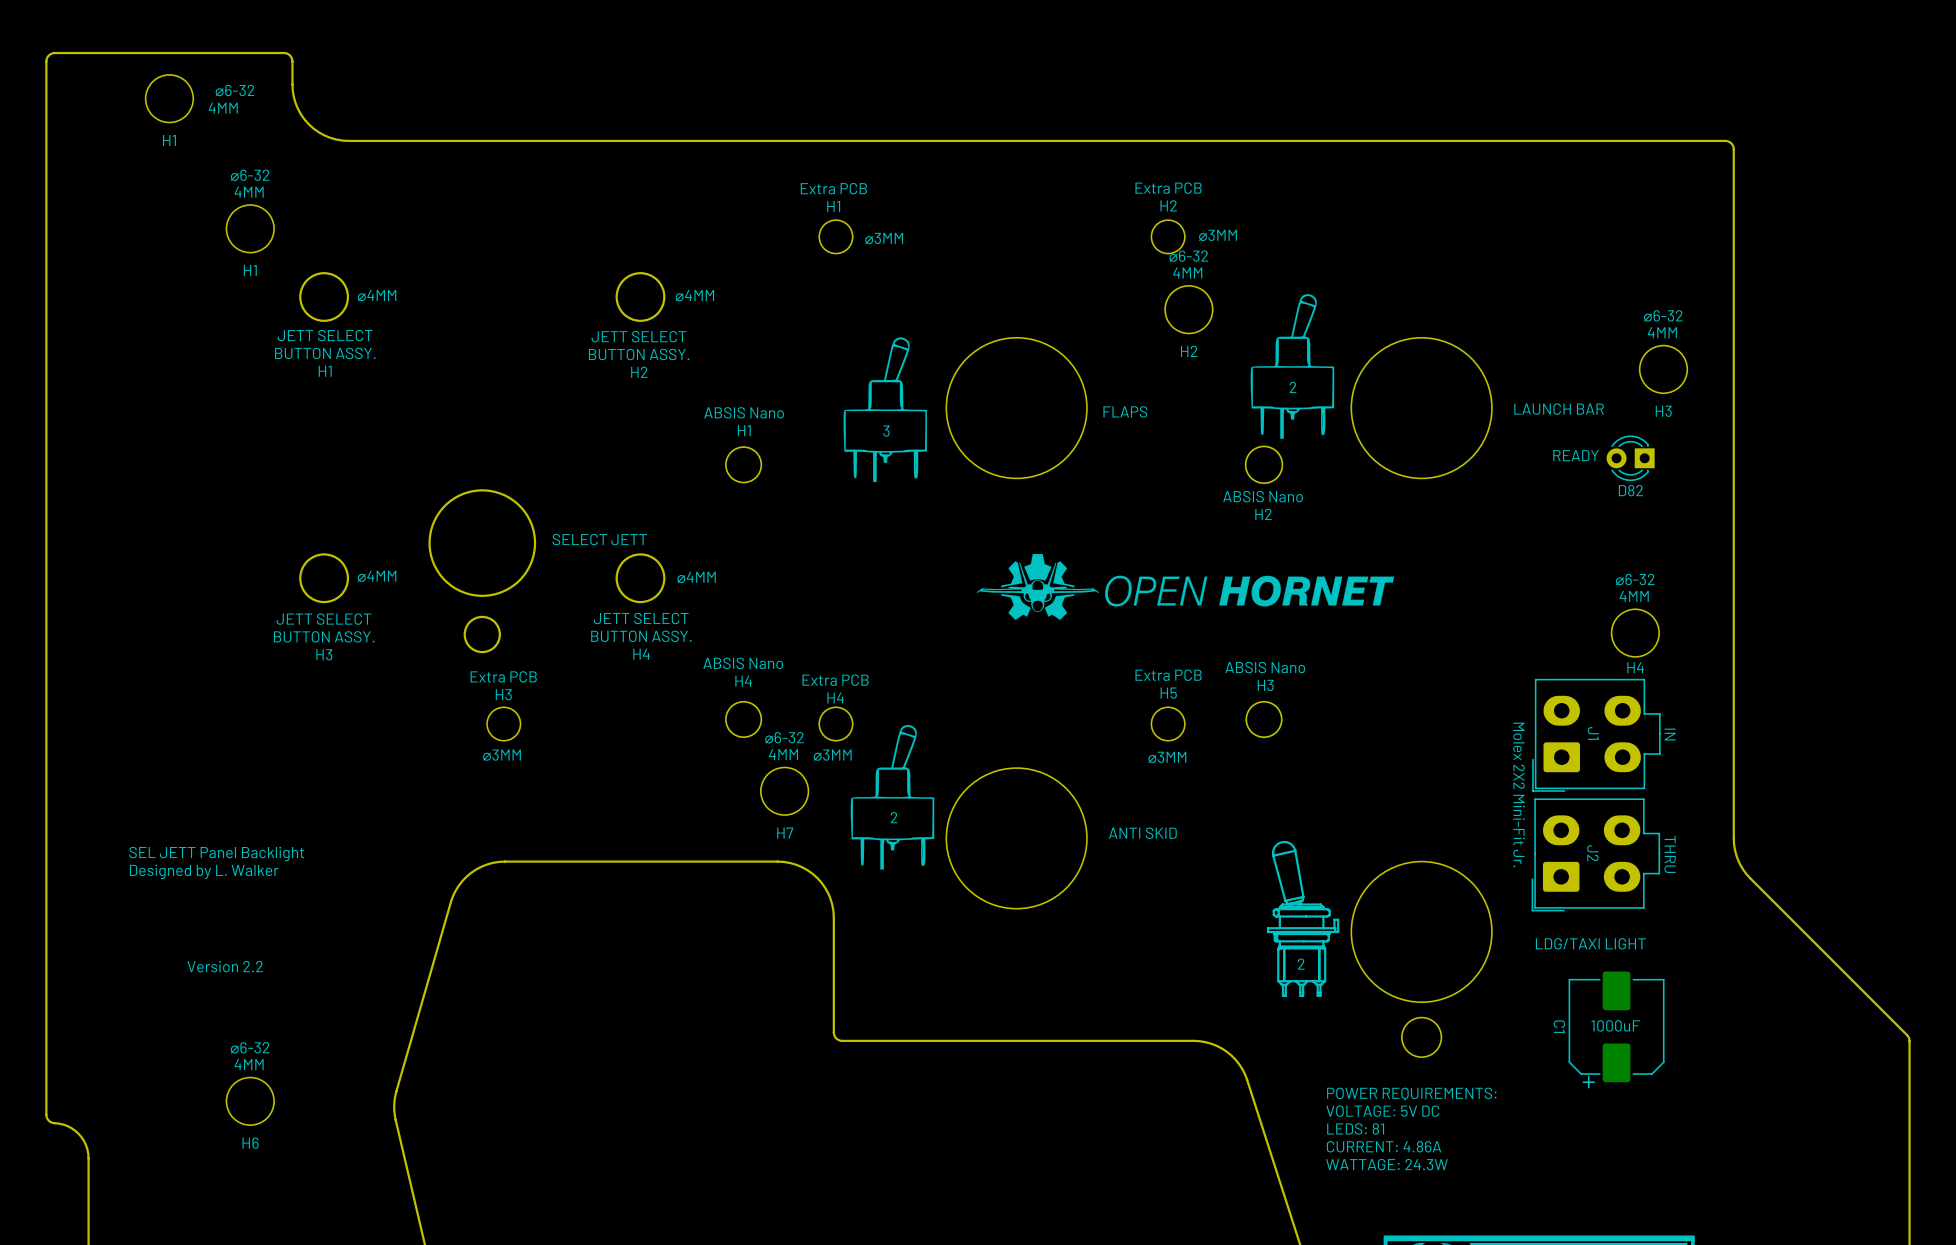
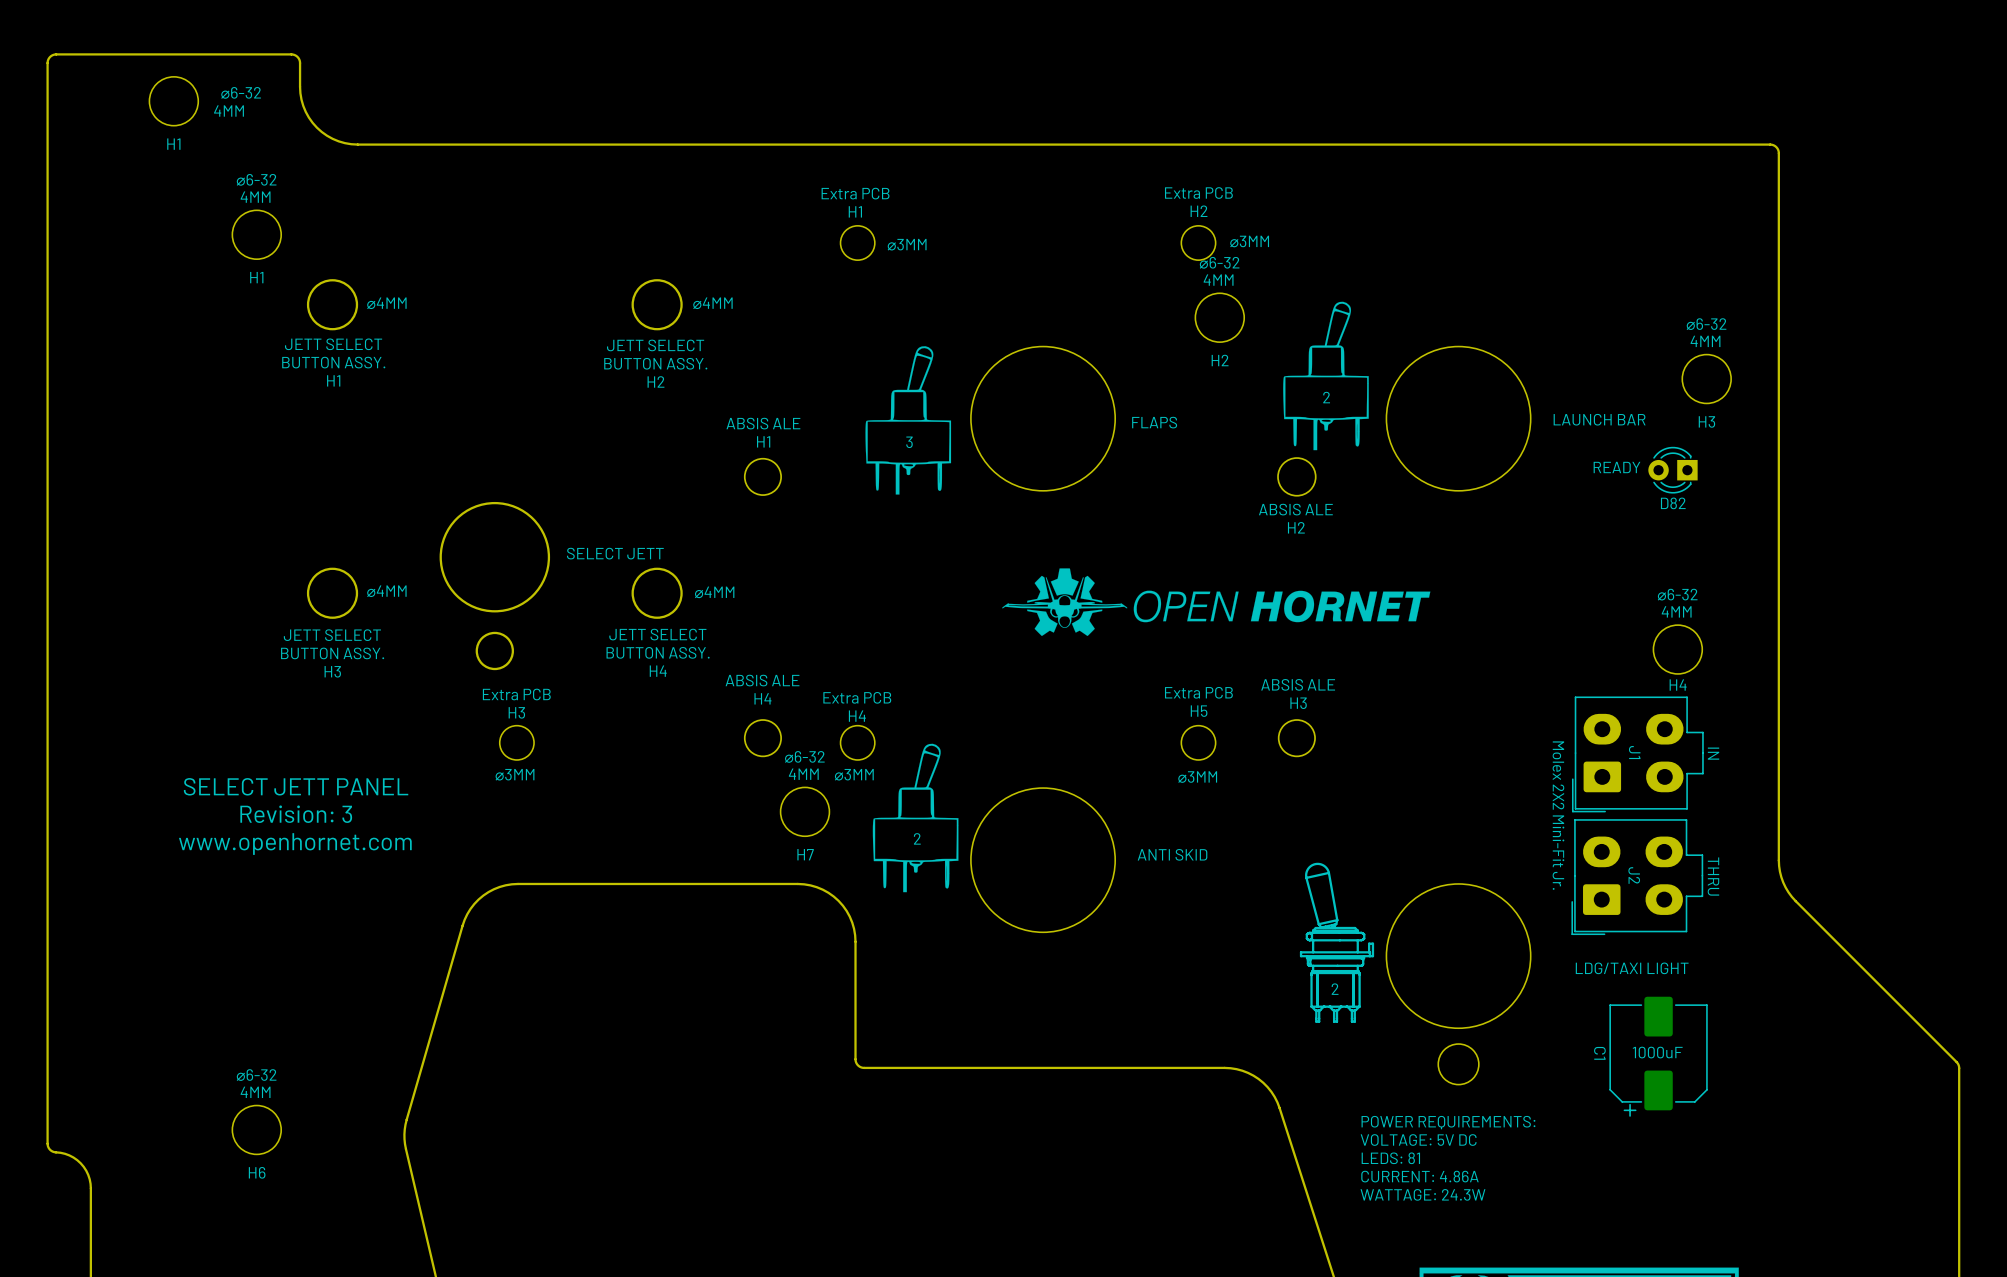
text: ABSIS Nano (744, 412) -> ABSIS ALE (763, 423)
text: ABSIS Nano (1263, 496) -> ABSIS ALE (1295, 509)
text: ABSIS Nano (743, 663) -> ABSIS ALE (762, 680)
text: ABSIS Nano (1265, 667) -> ABSIS ALE (1298, 684)
text: none -> SELECT JETT PANEL (296, 786)
text: none -> Revision: 3 (296, 814)
text: none -> www.openhornet.com (295, 844)
text: SEL JETT Panel Backlight (216, 854) -> none
text: Designed by L. Walker (204, 871) -> none
text: Version 2.2 (225, 966) -> none

